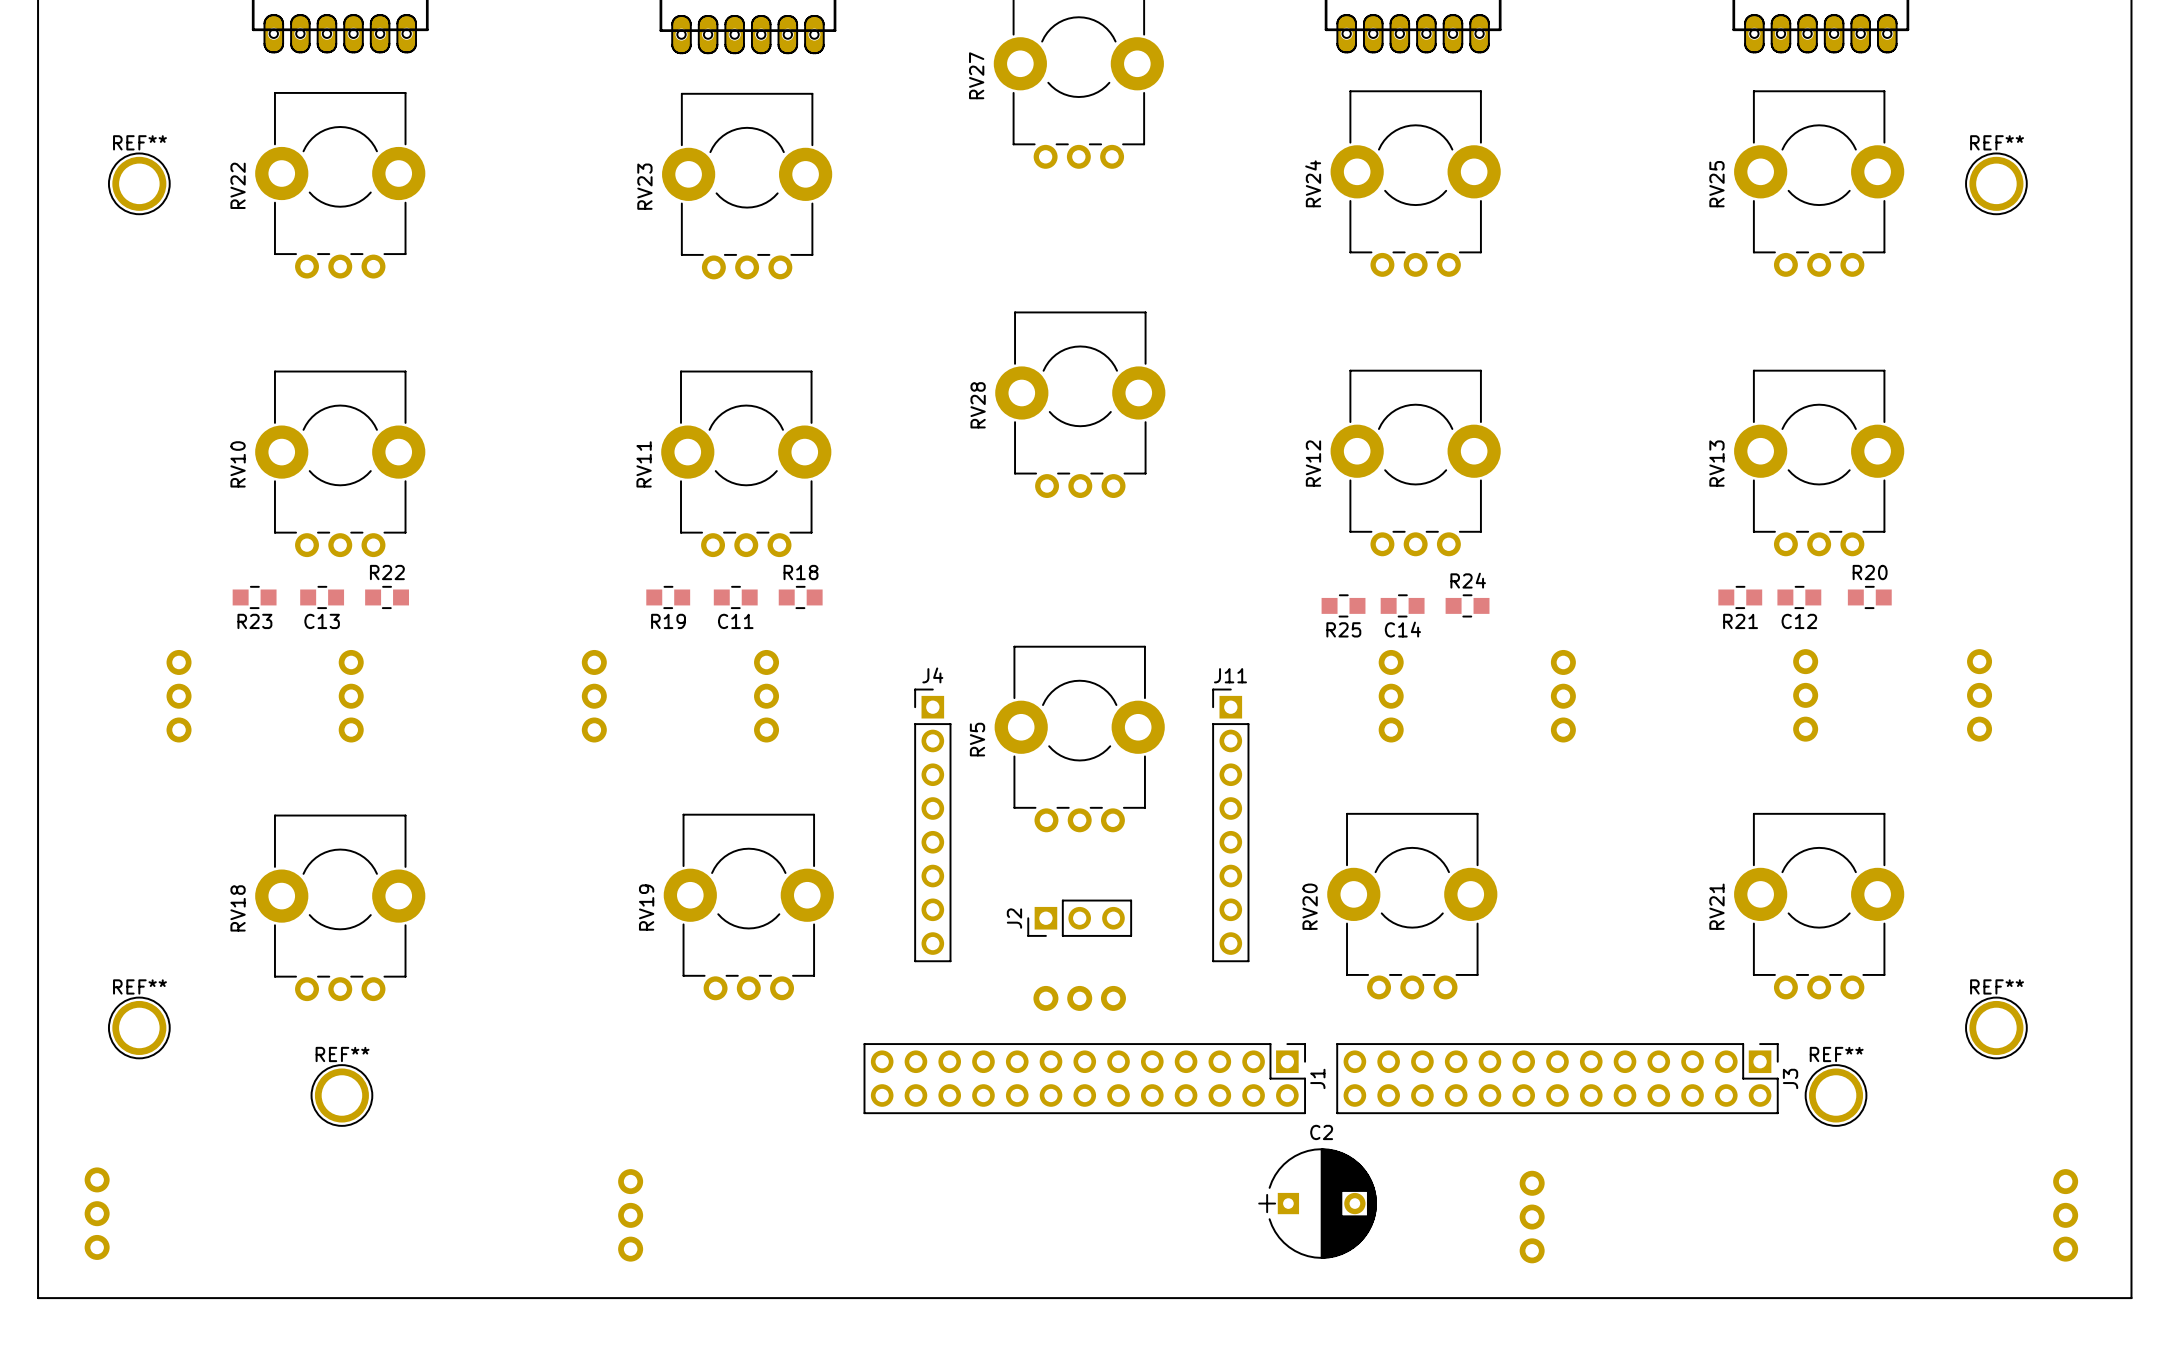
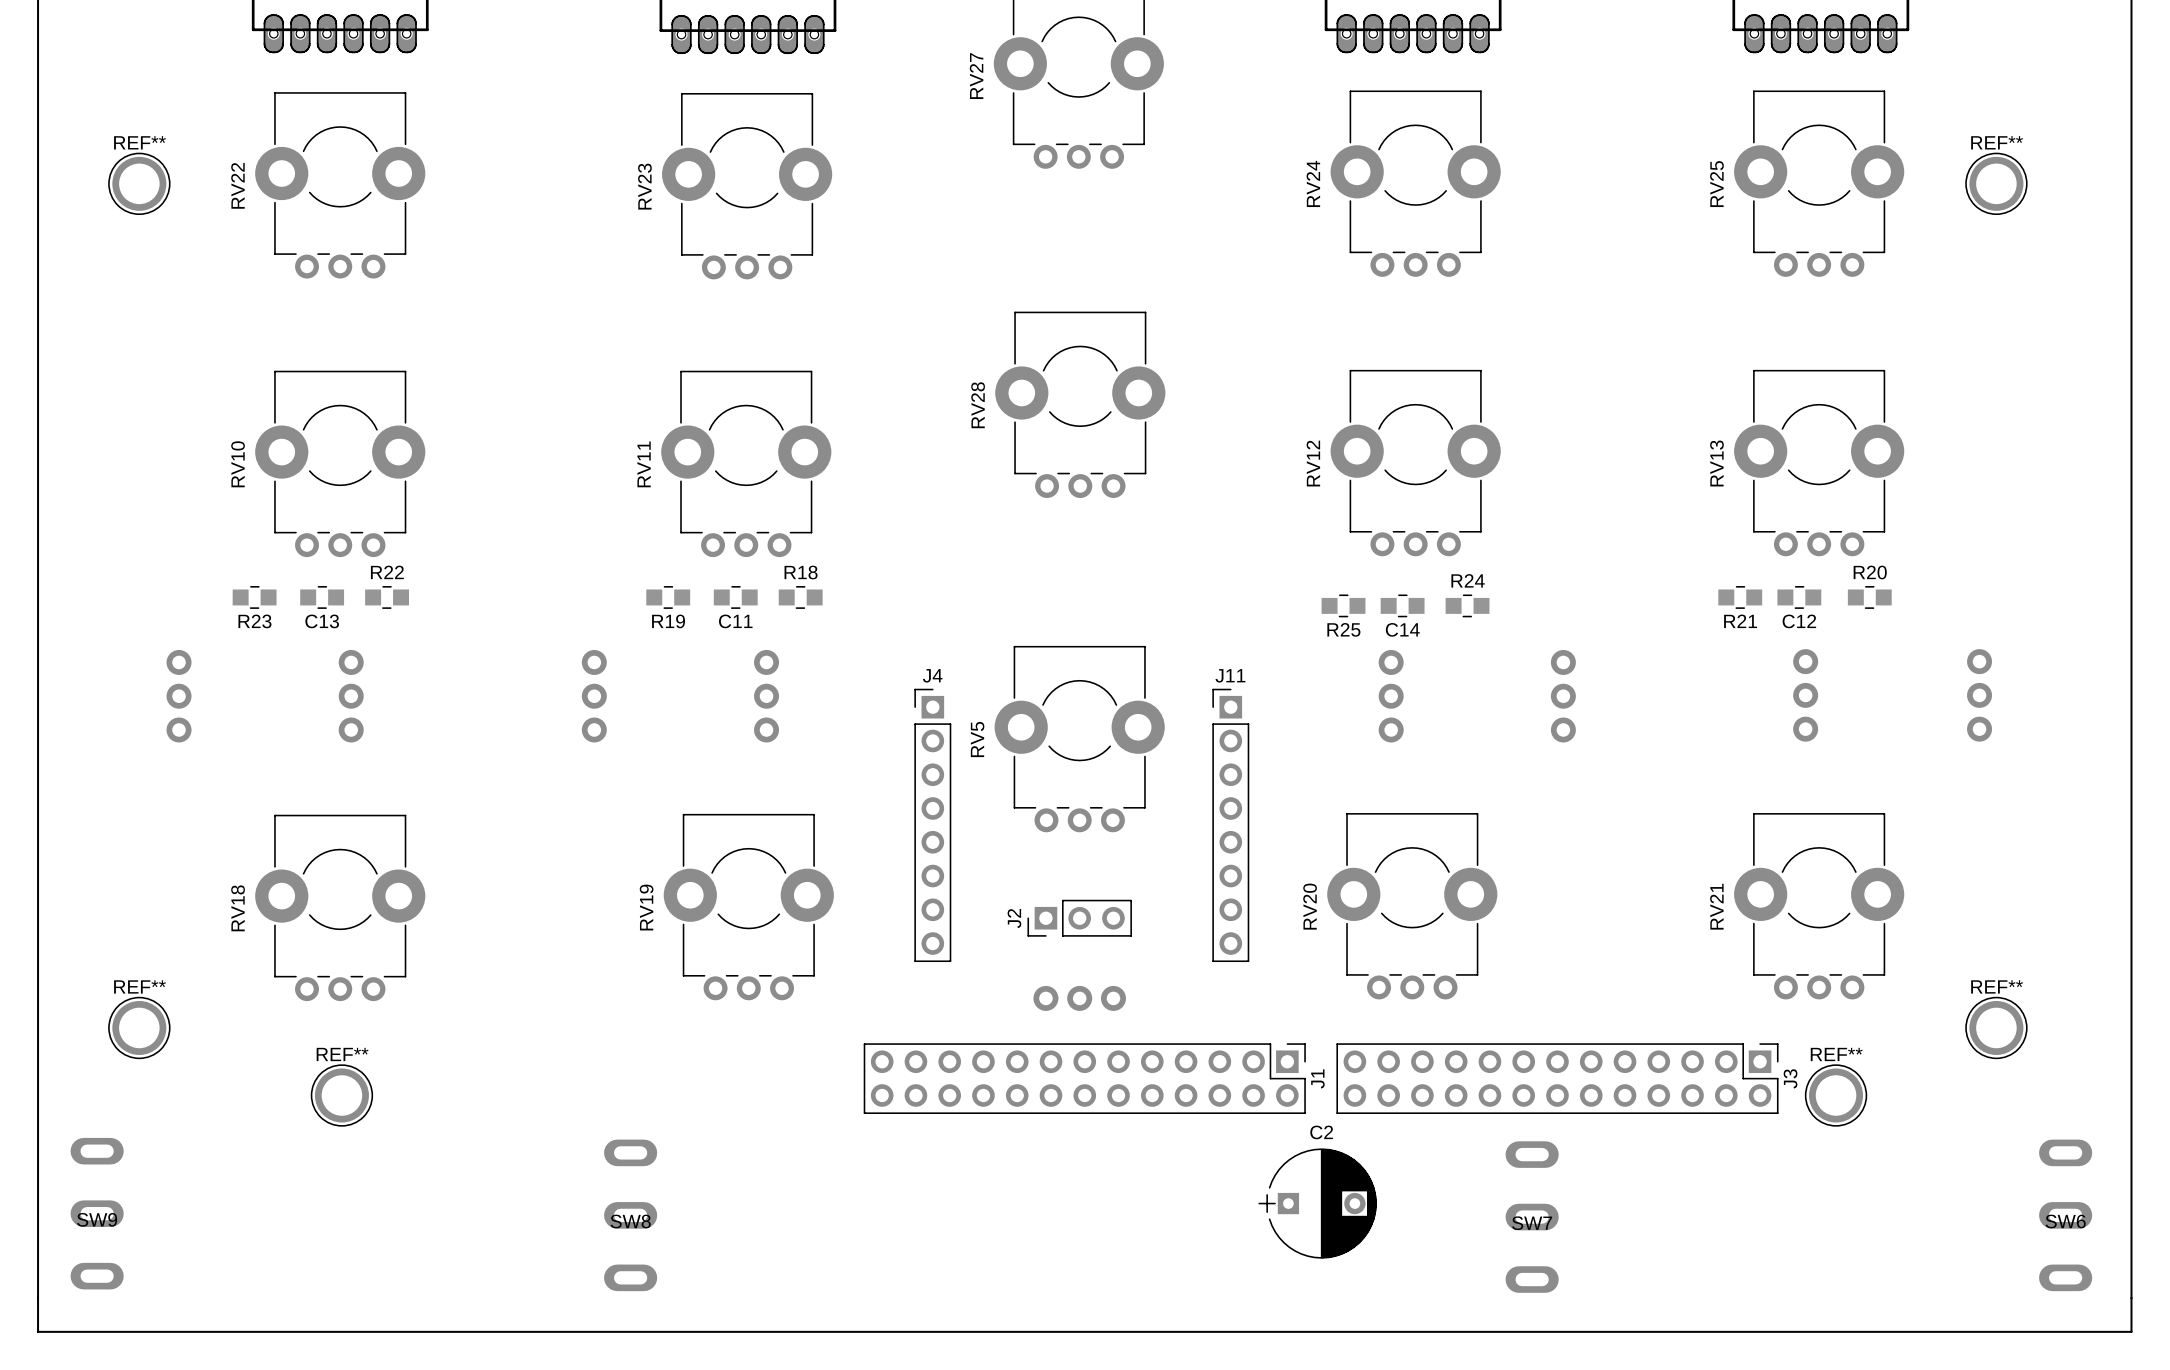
part: (97, 1213) -> none
SW9: none -> (97, 1213)
part: (630, 1215) -> none
SW8: none -> (630, 1215)
part: (2065, 1215) -> none
SW6: none -> (2065, 1215)
part: (1532, 1217) -> none
SW7: none -> (1532, 1217)
board edge: (38, 1298) (2131, 1298) -> (38, 1298) (38, 1331) (2131, 1331) (2131, 1298)

